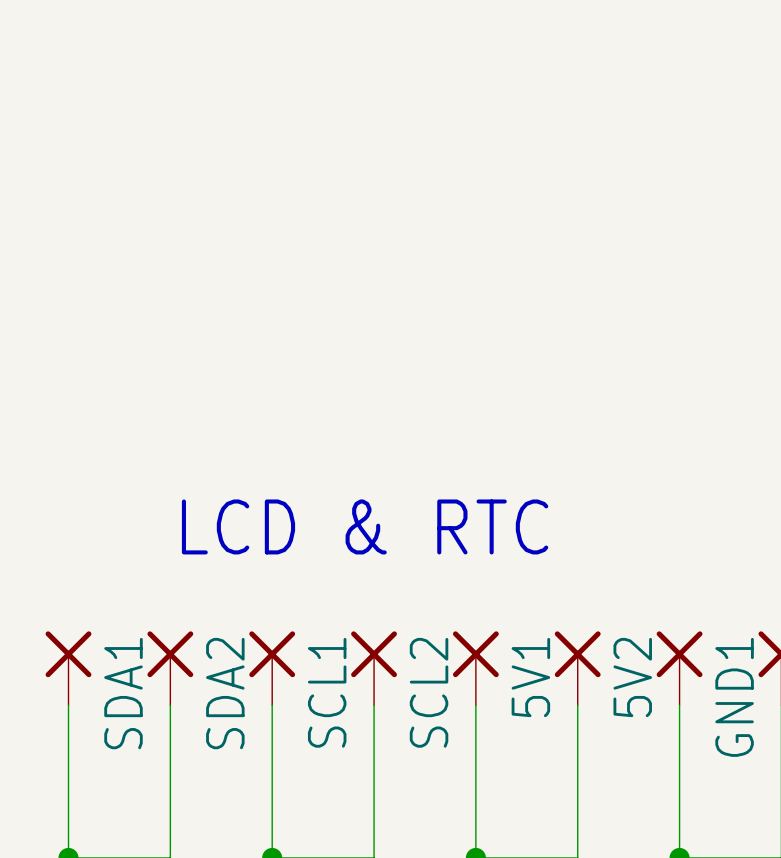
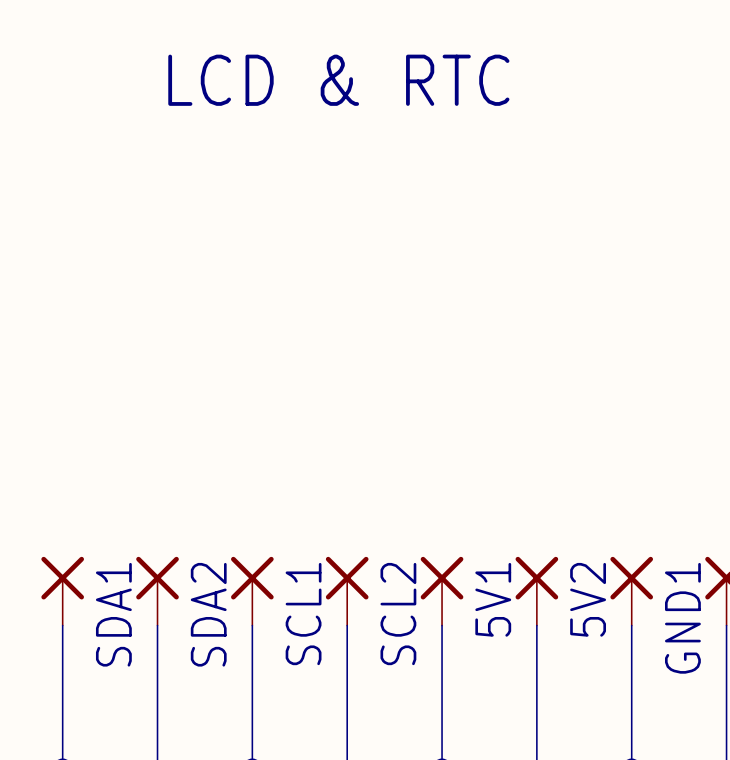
text position: LCD & RTC (365, 526) -> LCD & RTC (338, 80)

